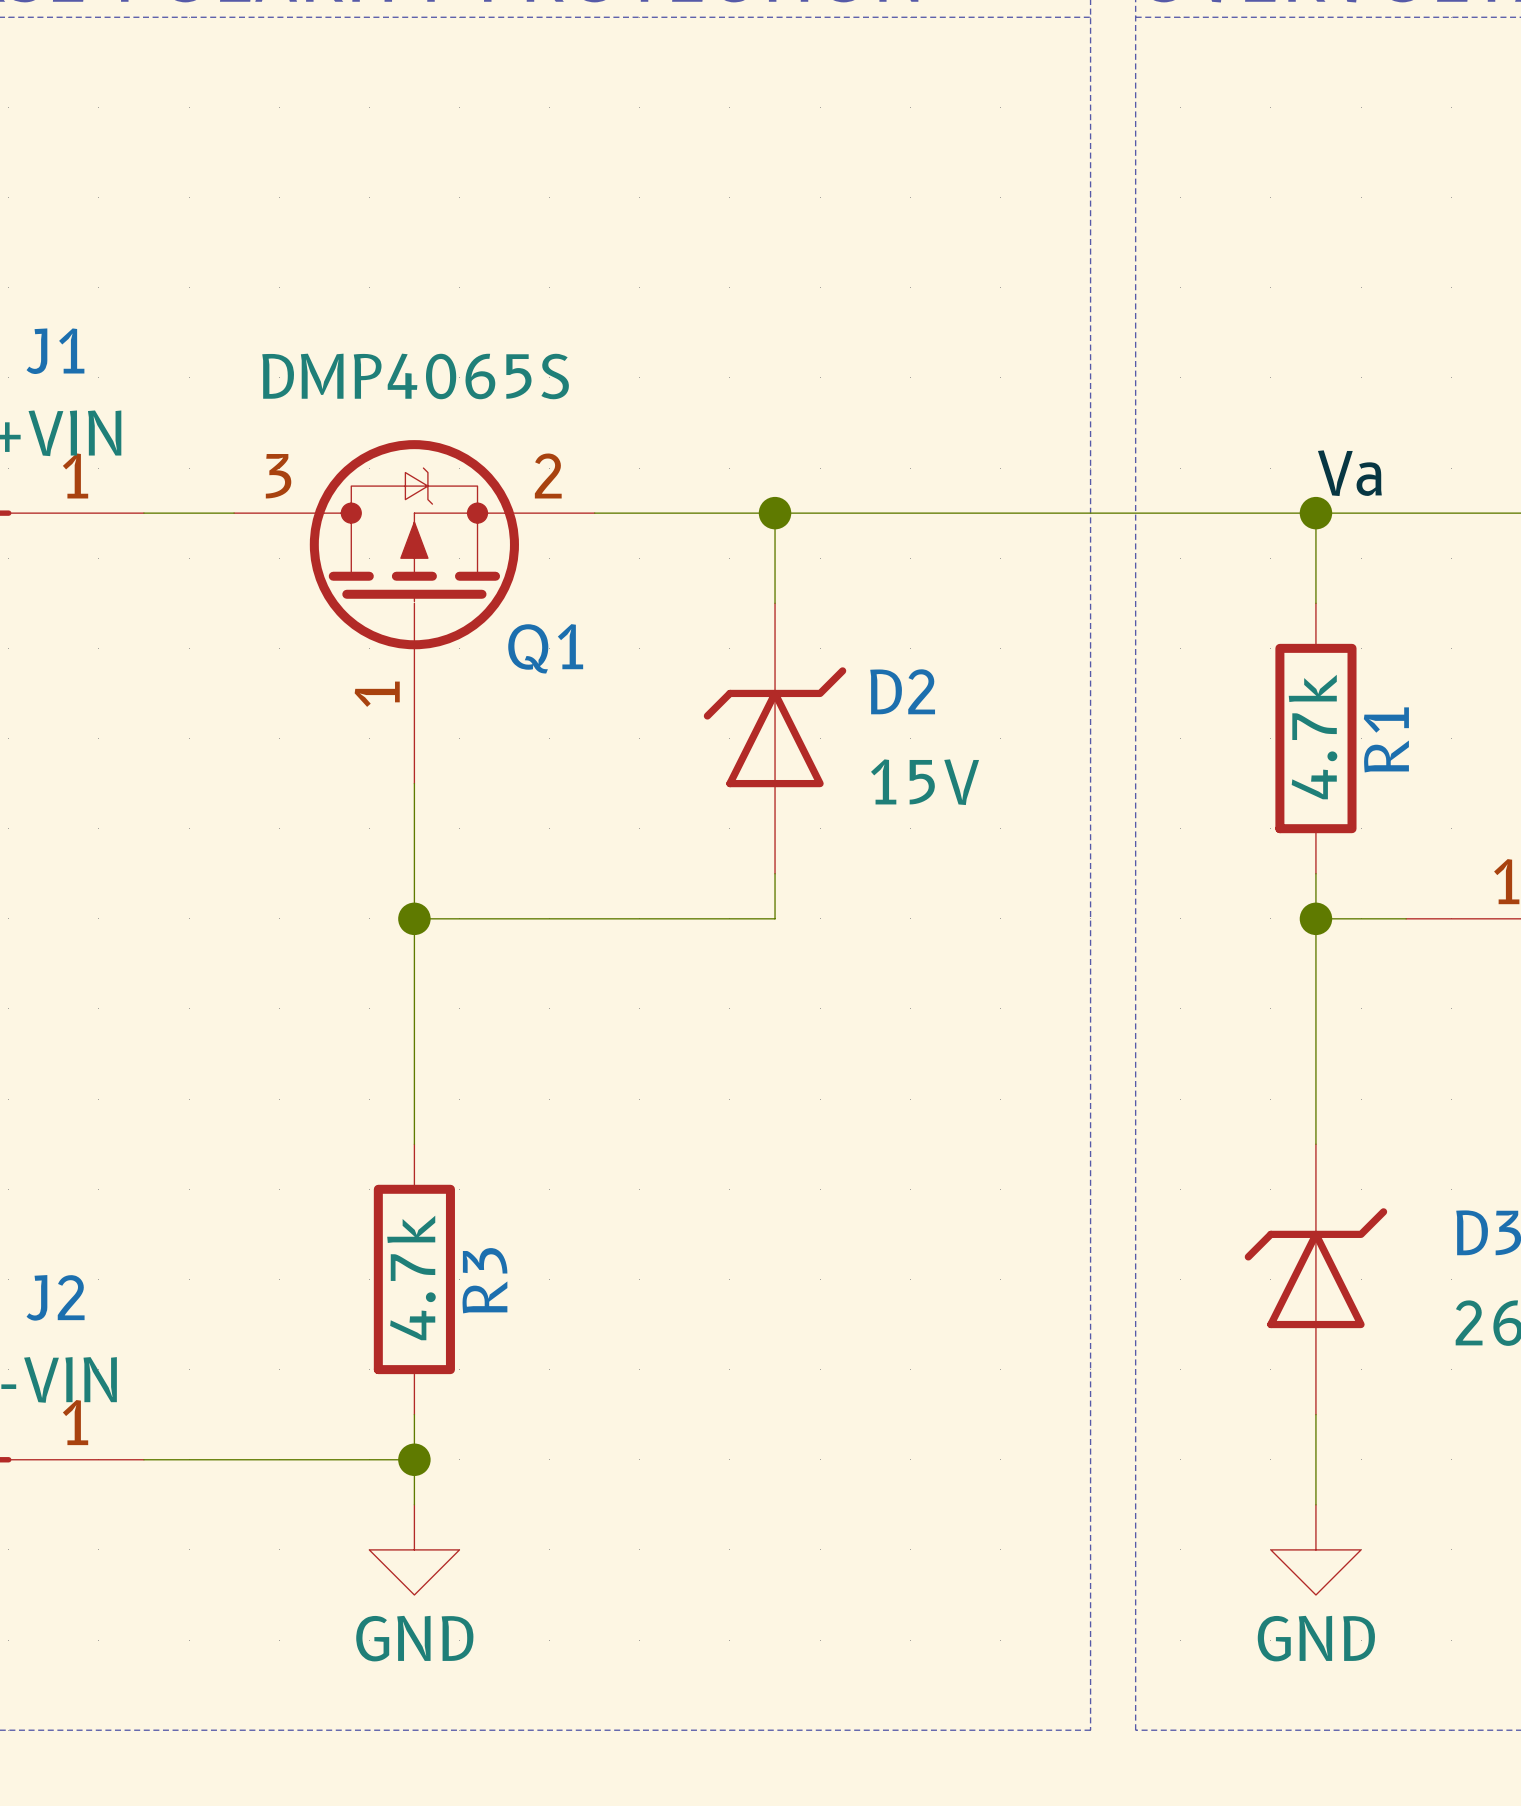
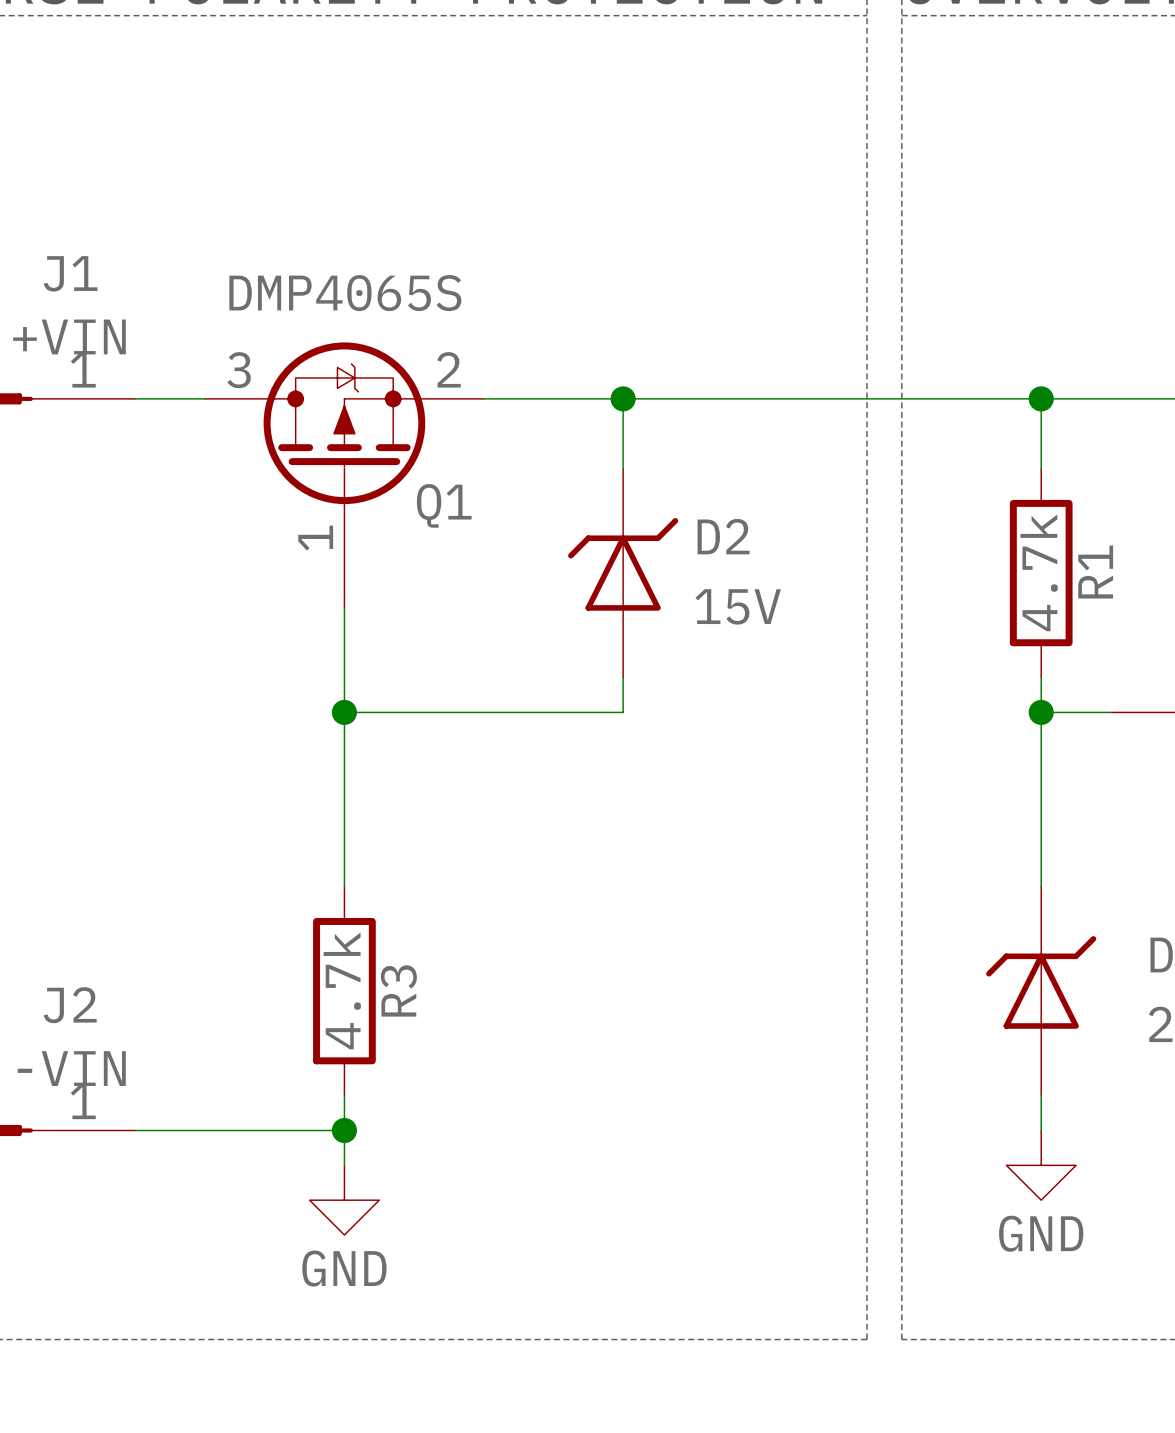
label: Va (1349, 473) -> none
power symbol position: GND (1315, 1549) -> GND (1041, 1165)

